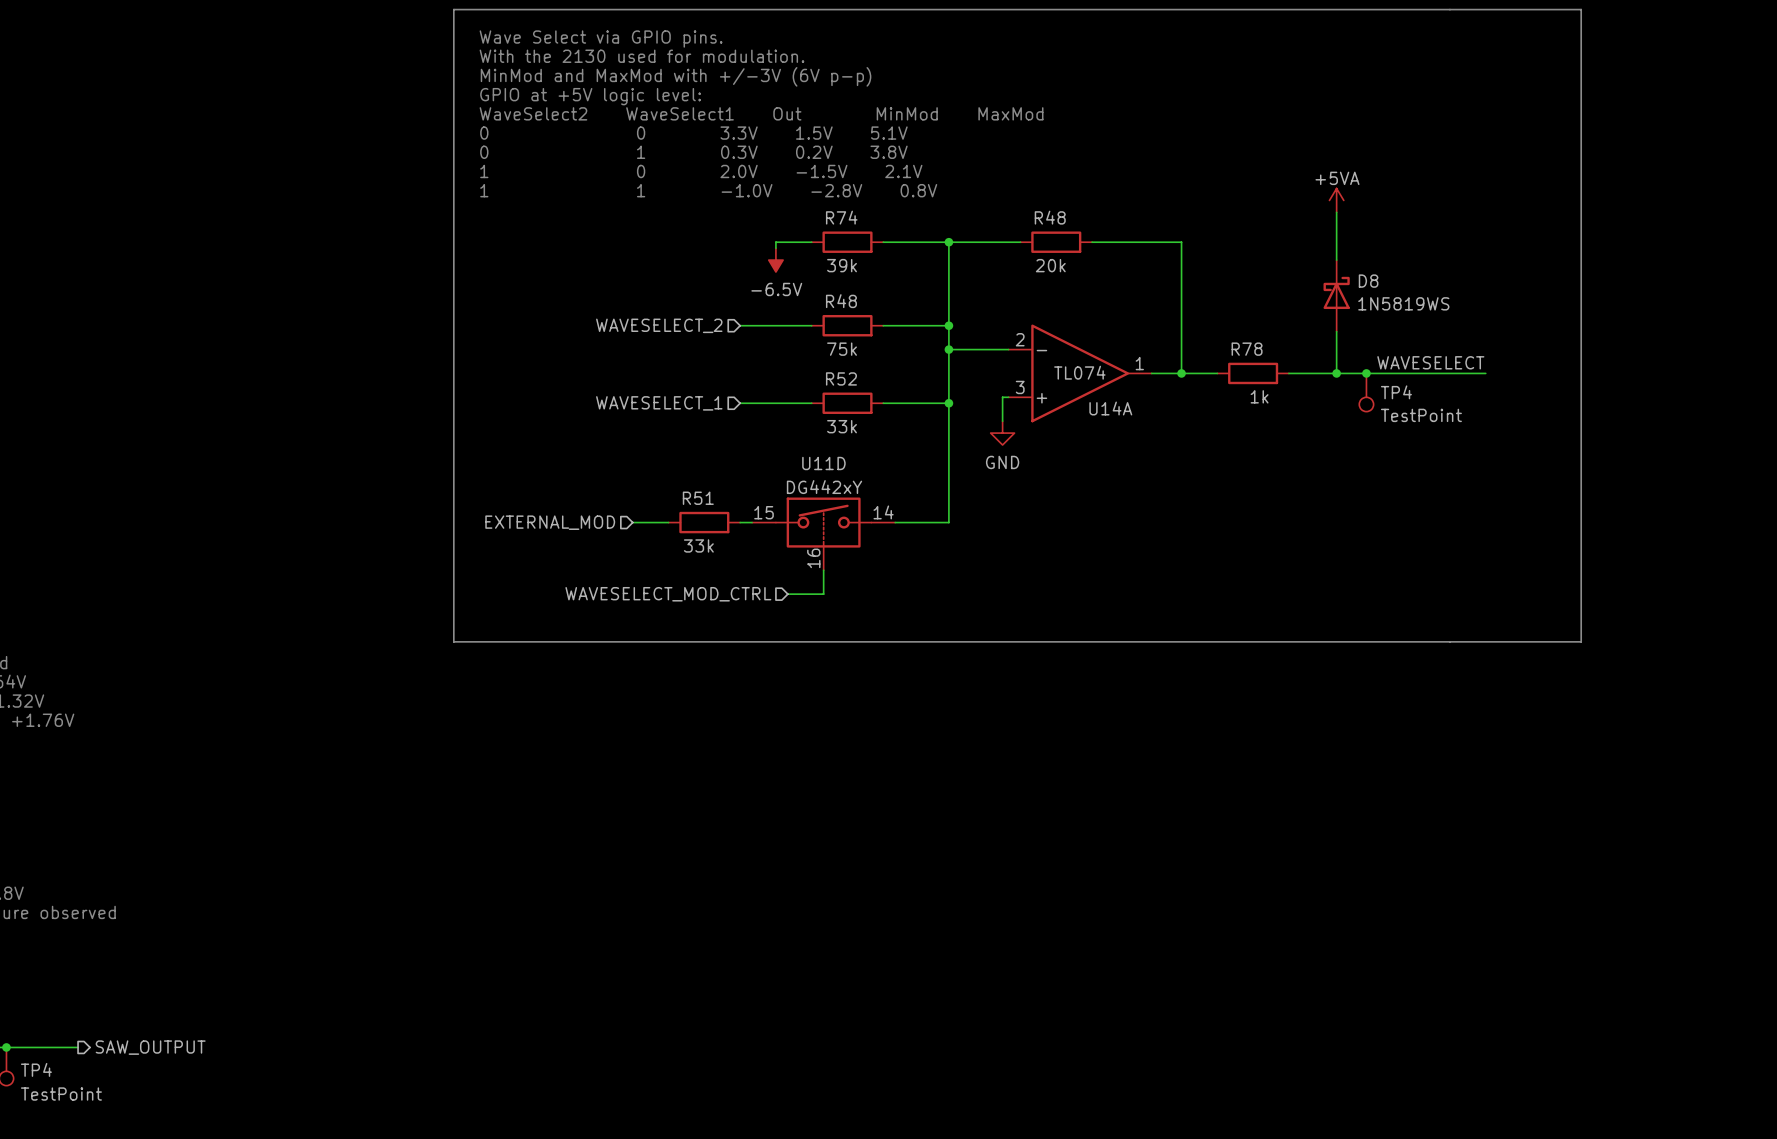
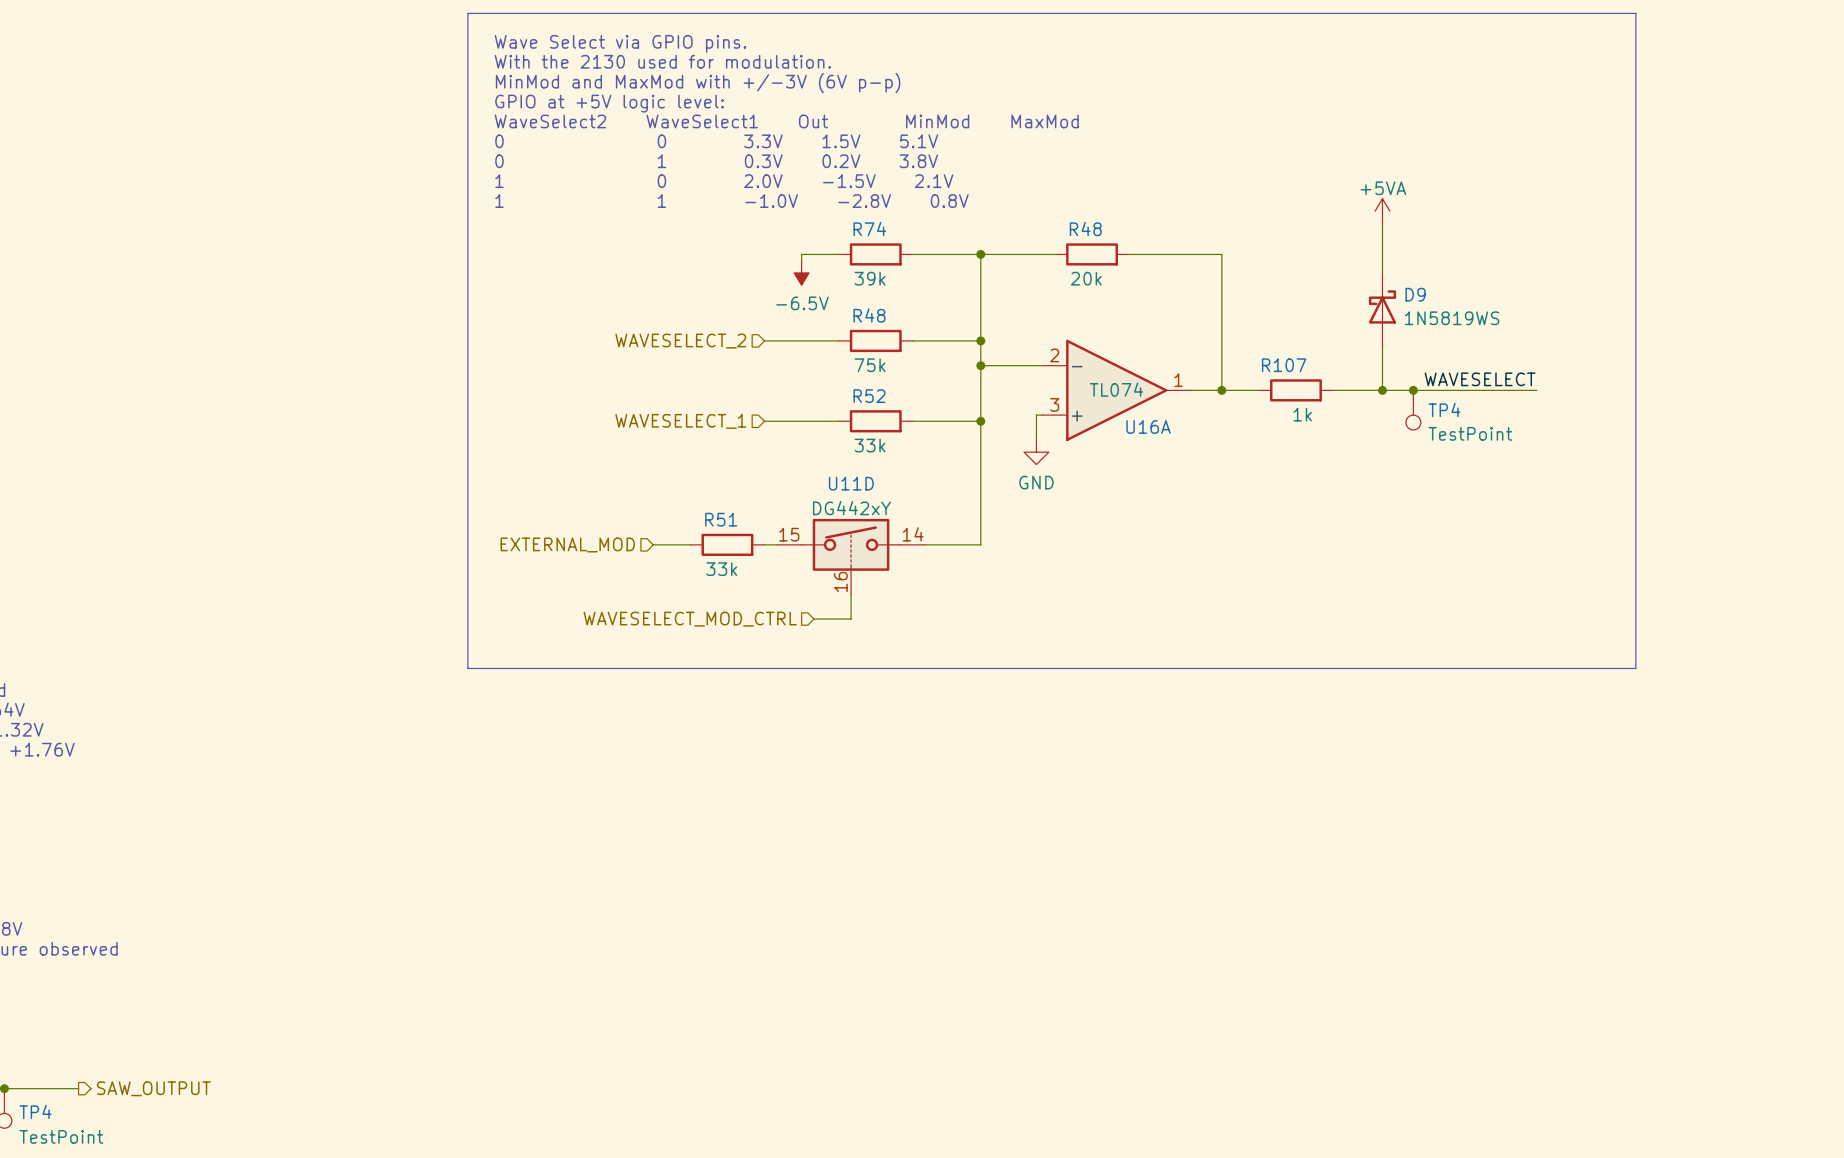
D8 name: D8 (1368, 281) -> D9 (1415, 294)
R78 name: R78 (1247, 349) -> R107 (1284, 365)
U14A name: U14A (1110, 408) -> U16A (1148, 426)

